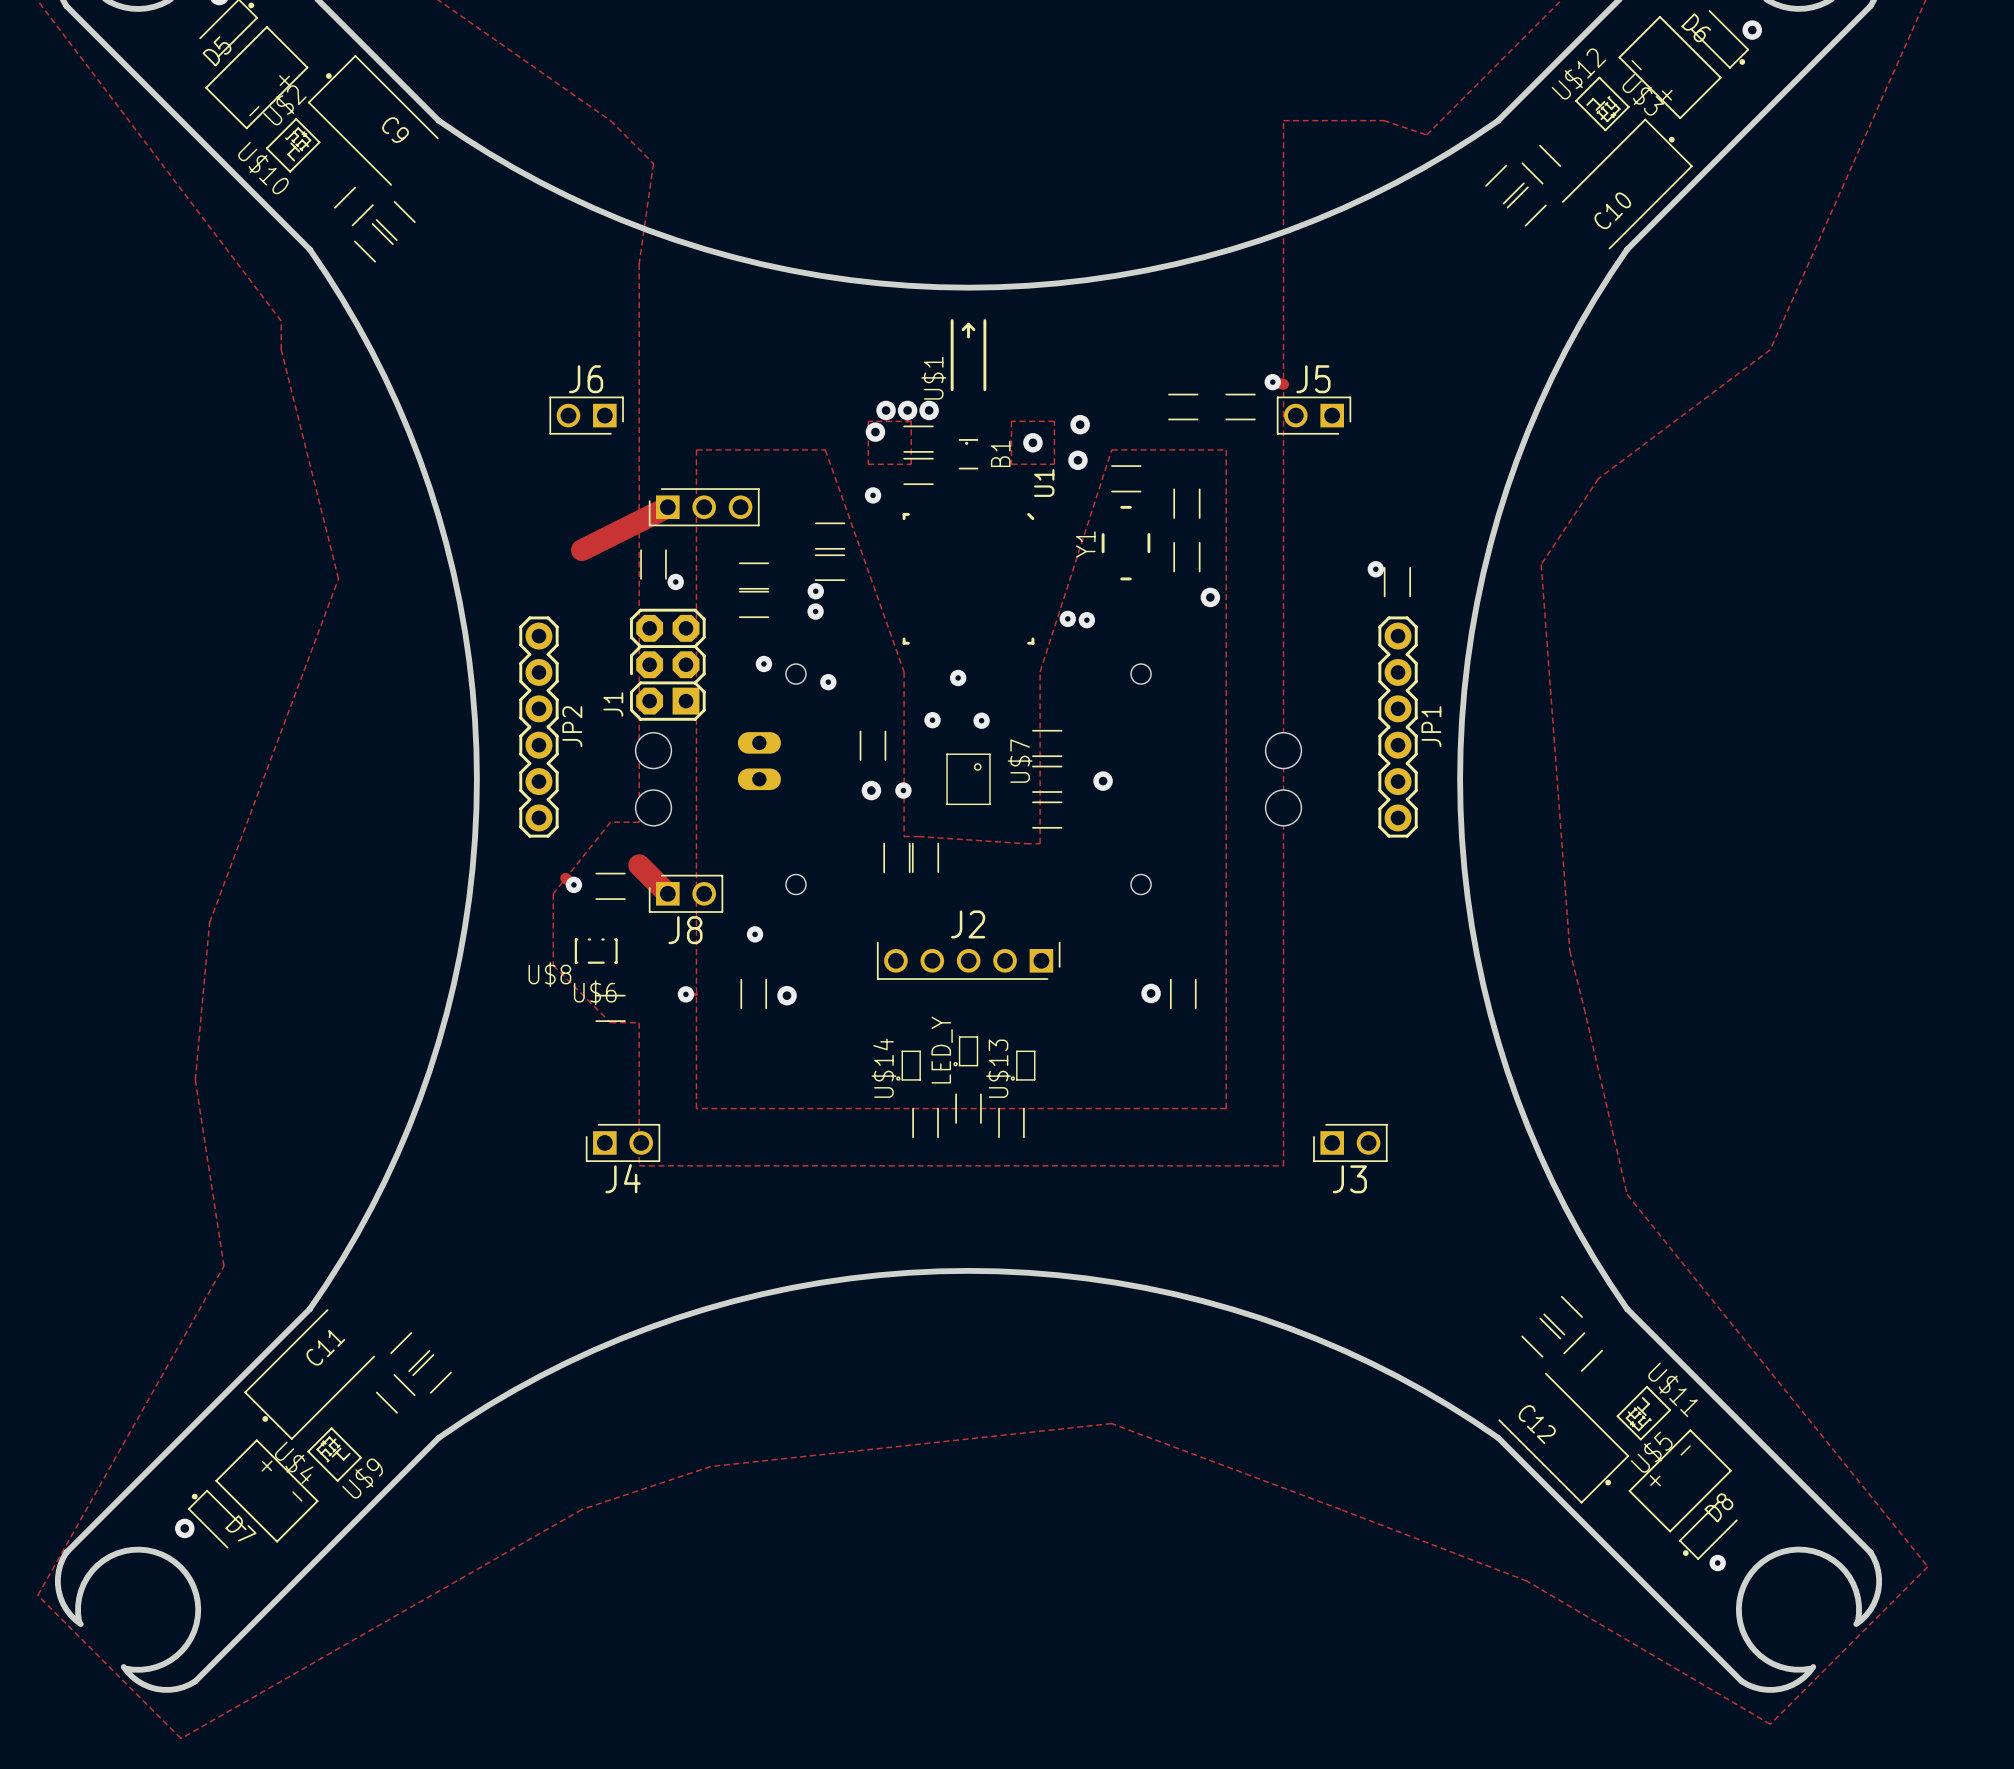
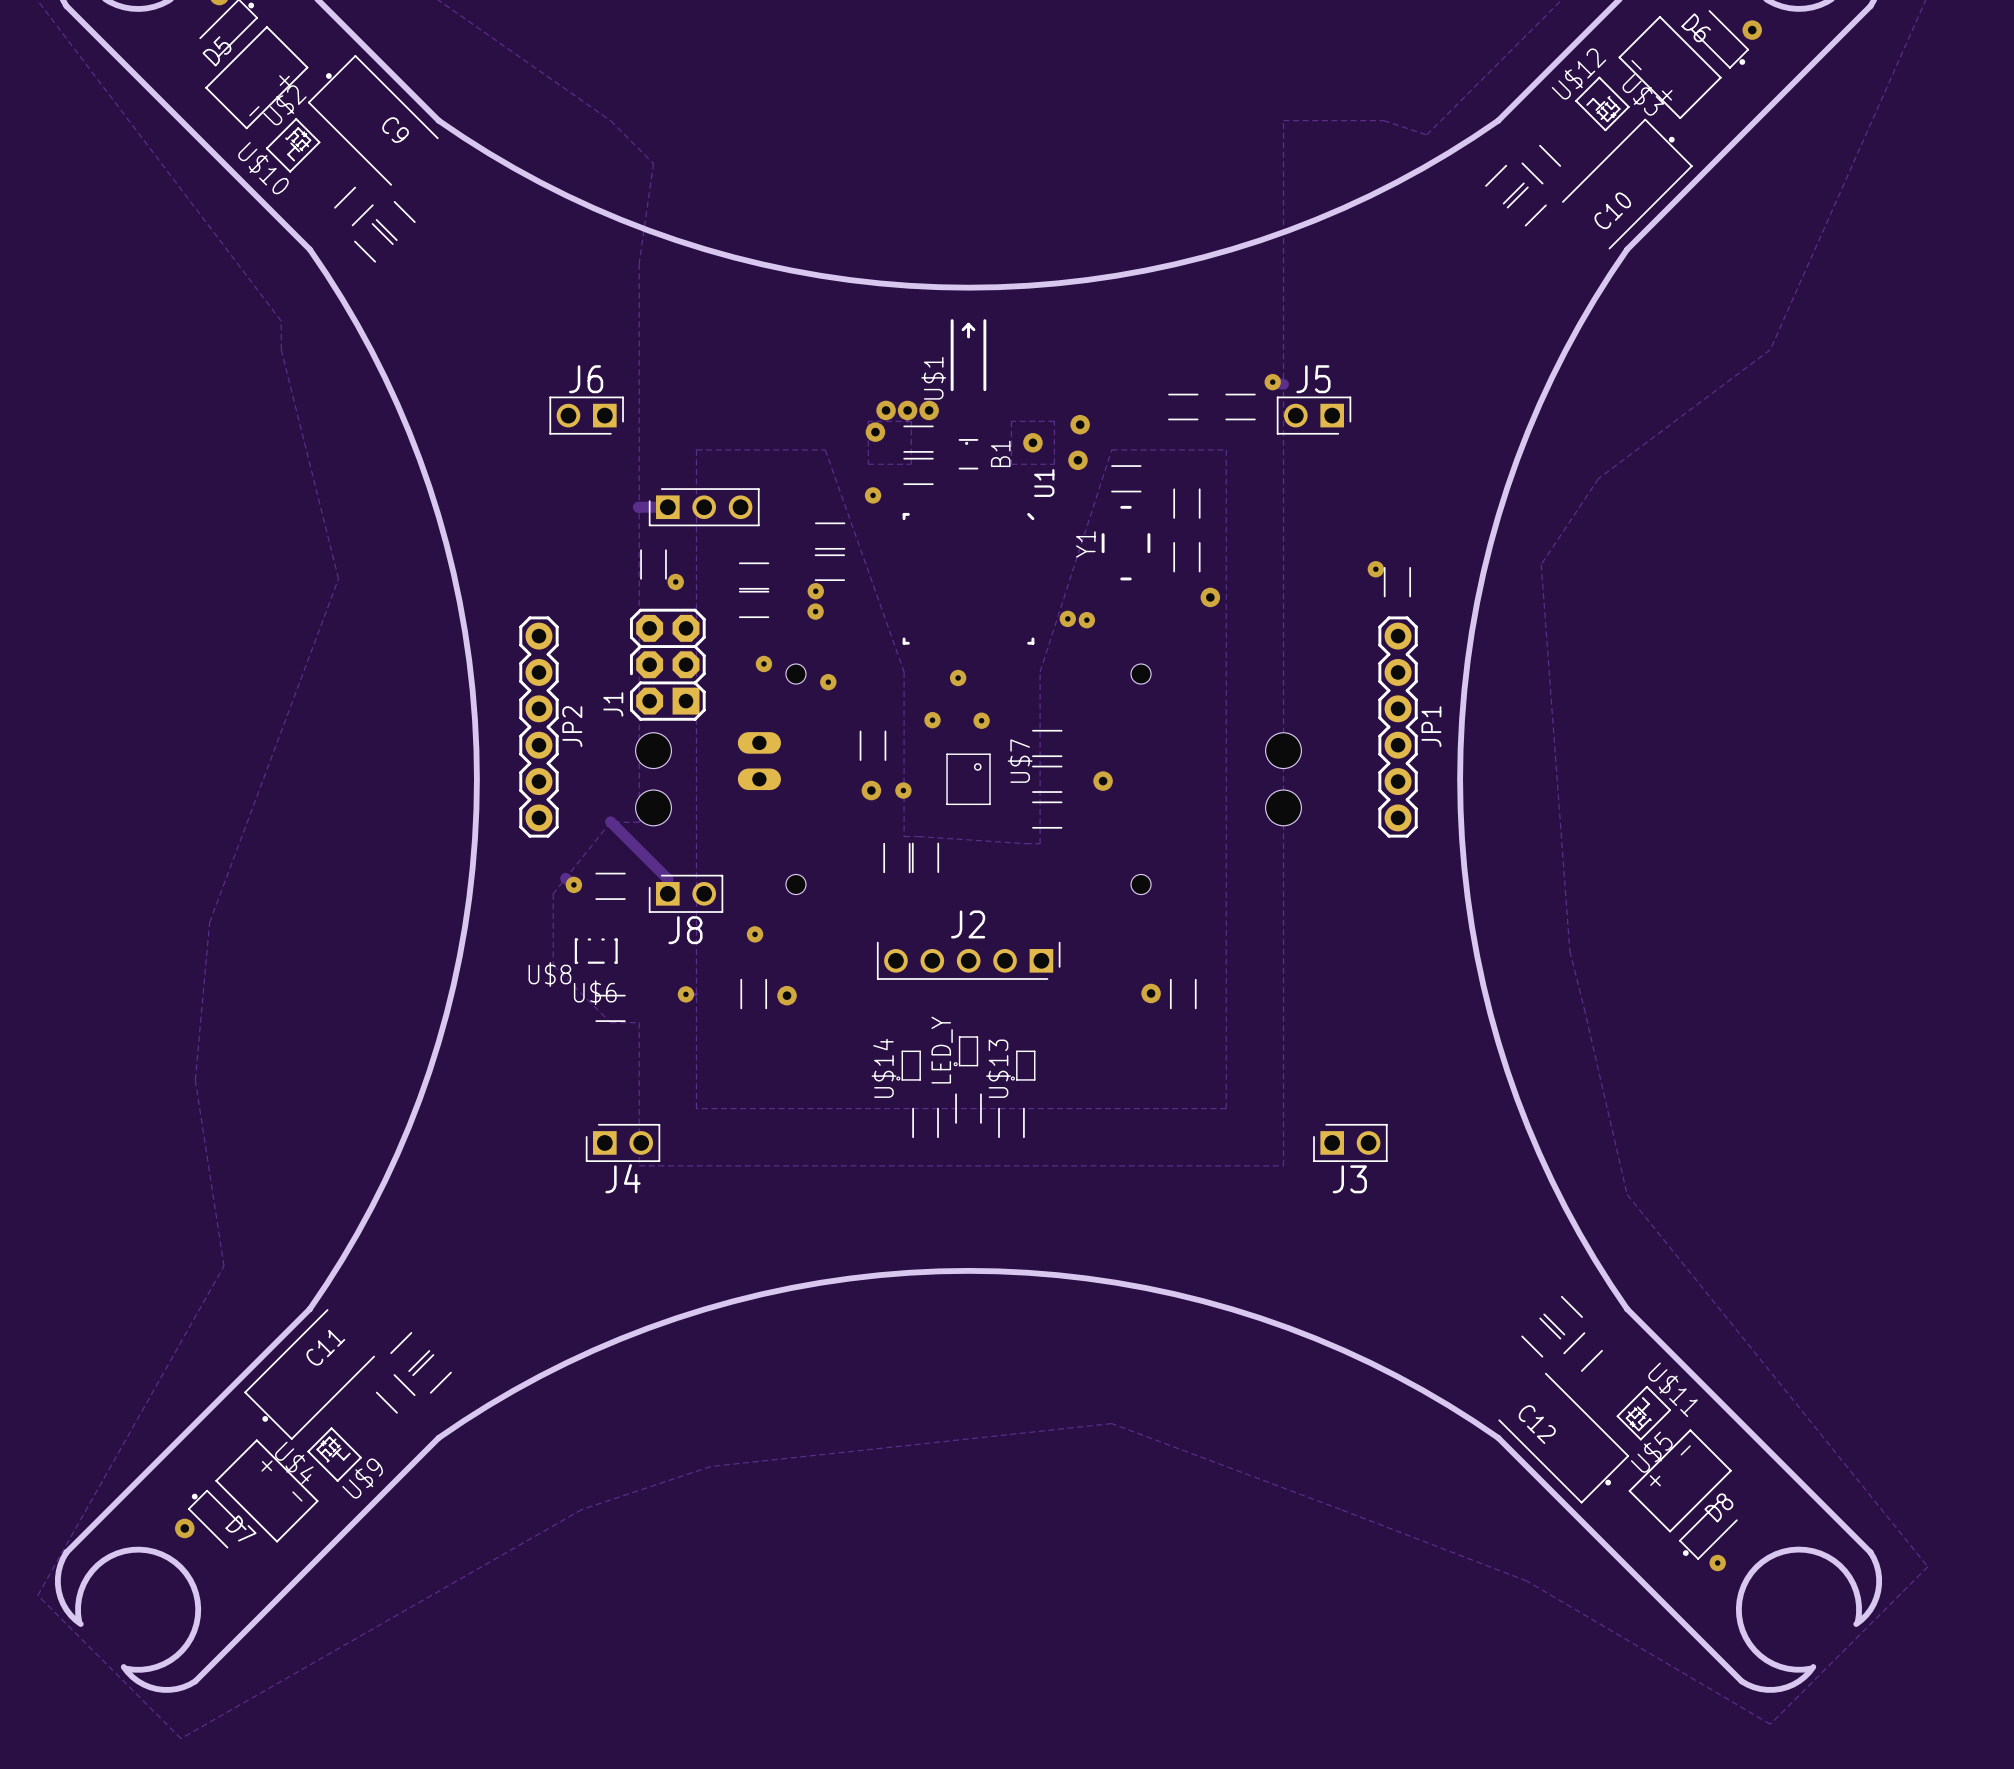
track: (667, 507) (581, 550) -> (667, 507) (638, 507)
track: (639, 865) (667, 893) -> (610, 821) (667, 879) (667, 893)

